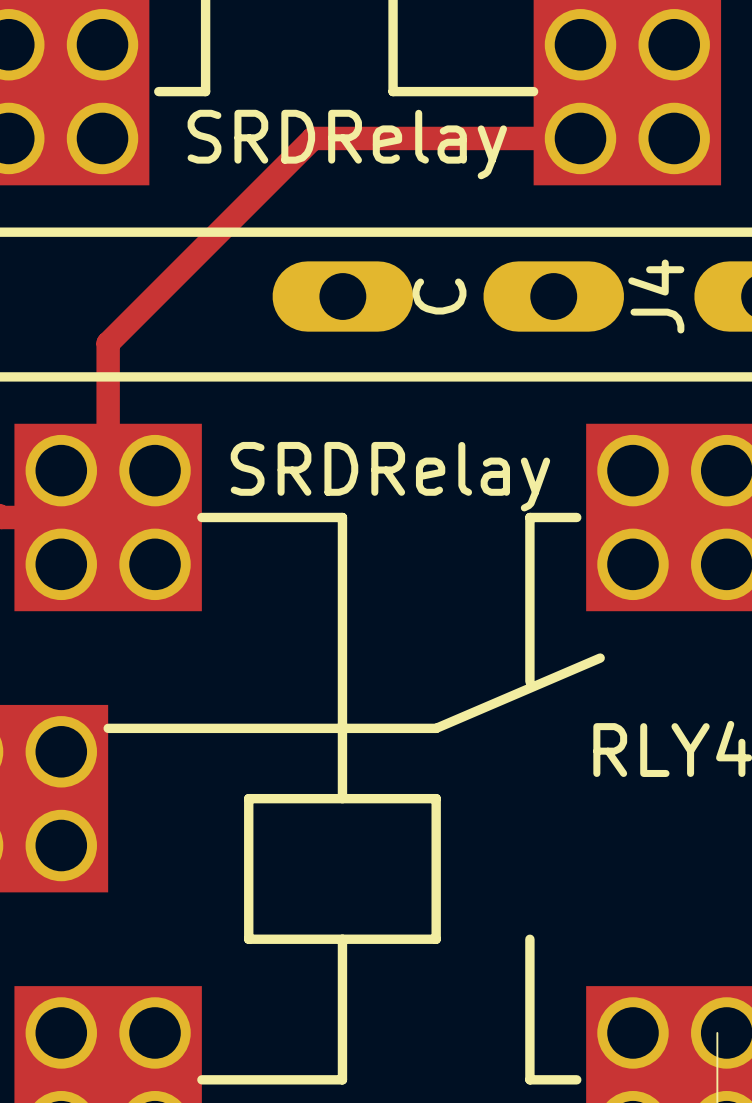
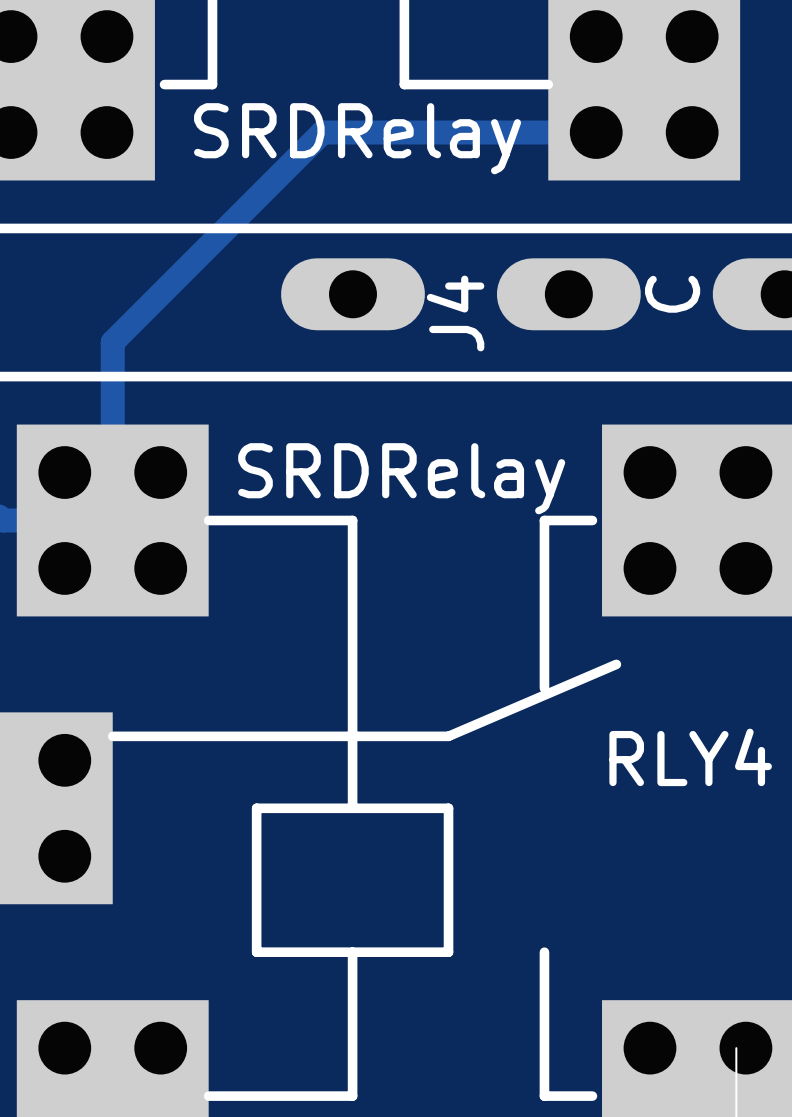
J4 text position: C (439, 296) -> C (672, 294)
J4 name position: J4 (656, 296) -> J4 (455, 313)

